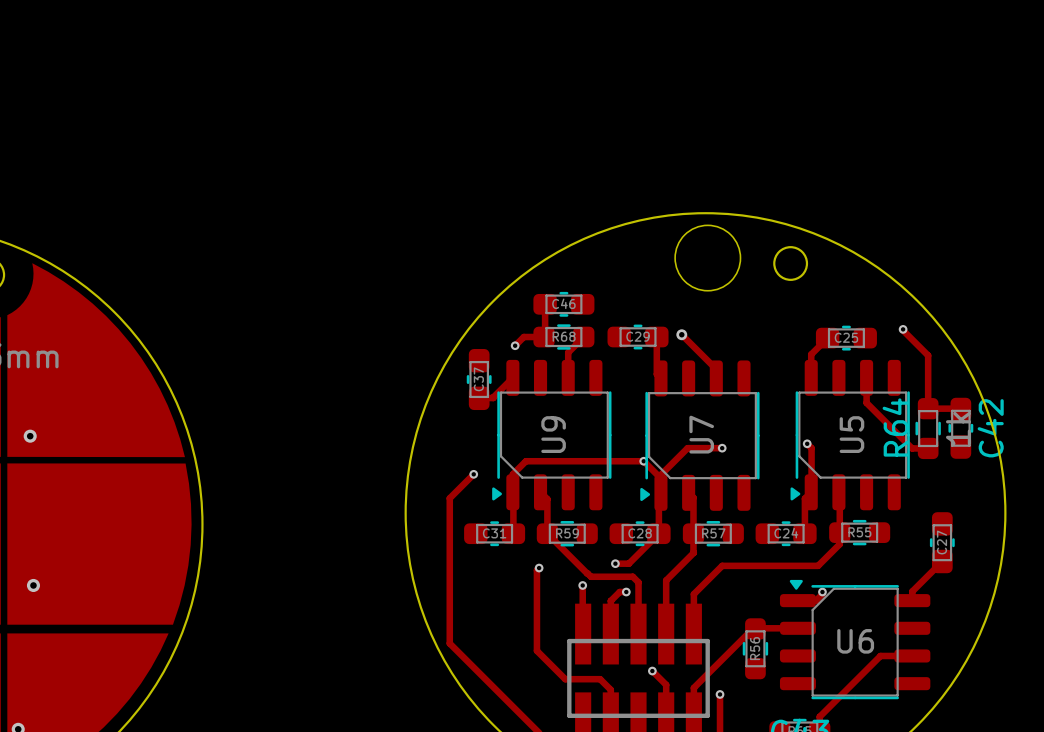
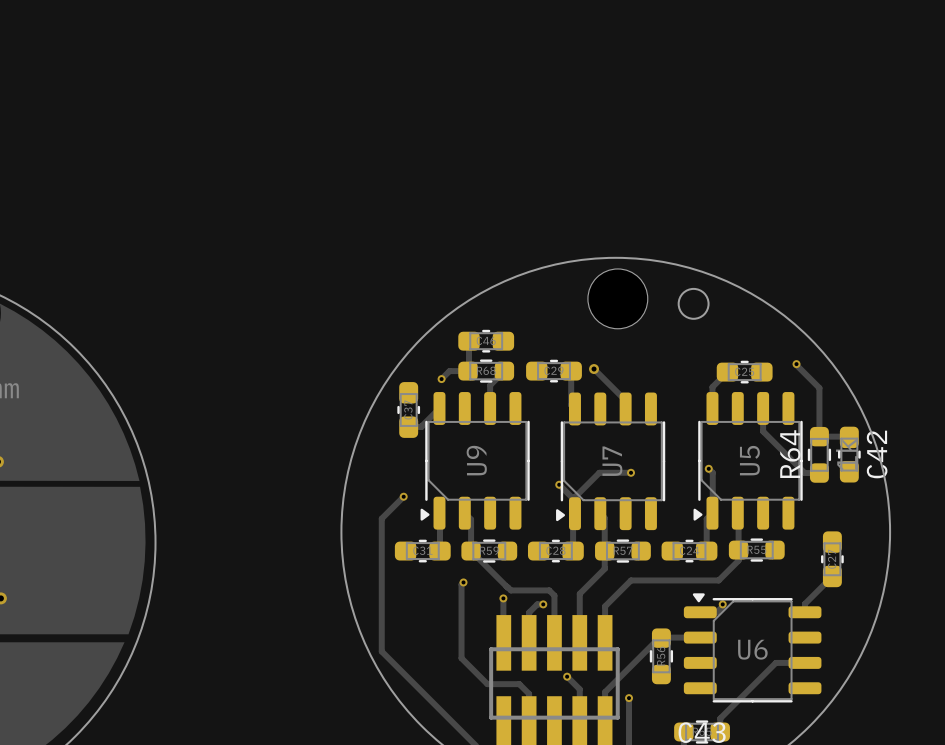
track: (643, 461) (525, 461) (512, 474) (512, 492) -> none
track: (658, 533) (628, 563) (615, 563) -> none
via: (615, 563) -> none

